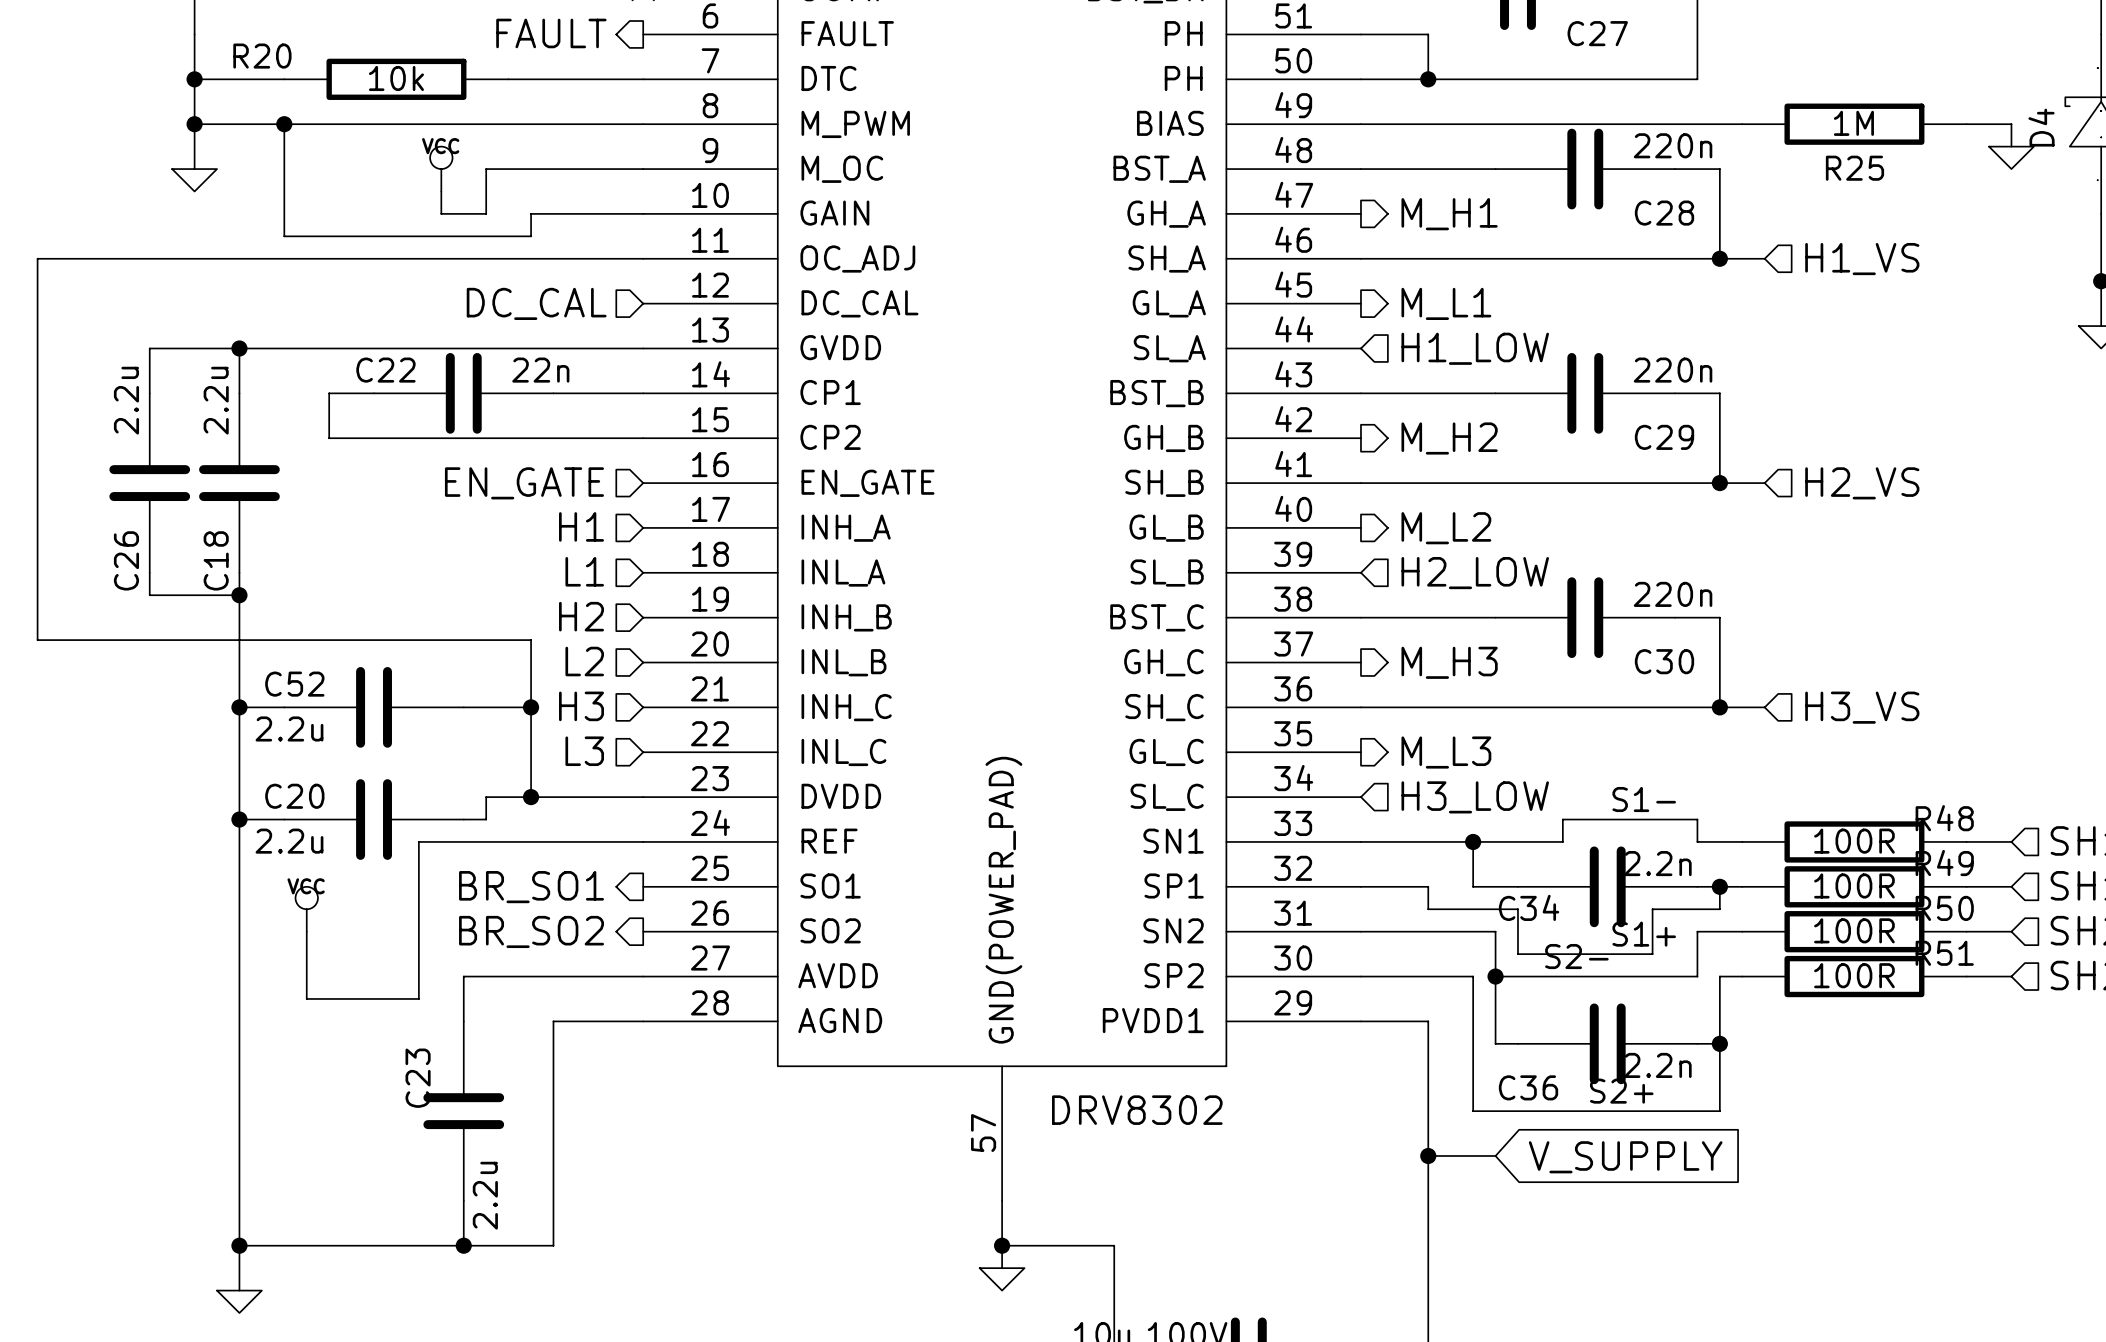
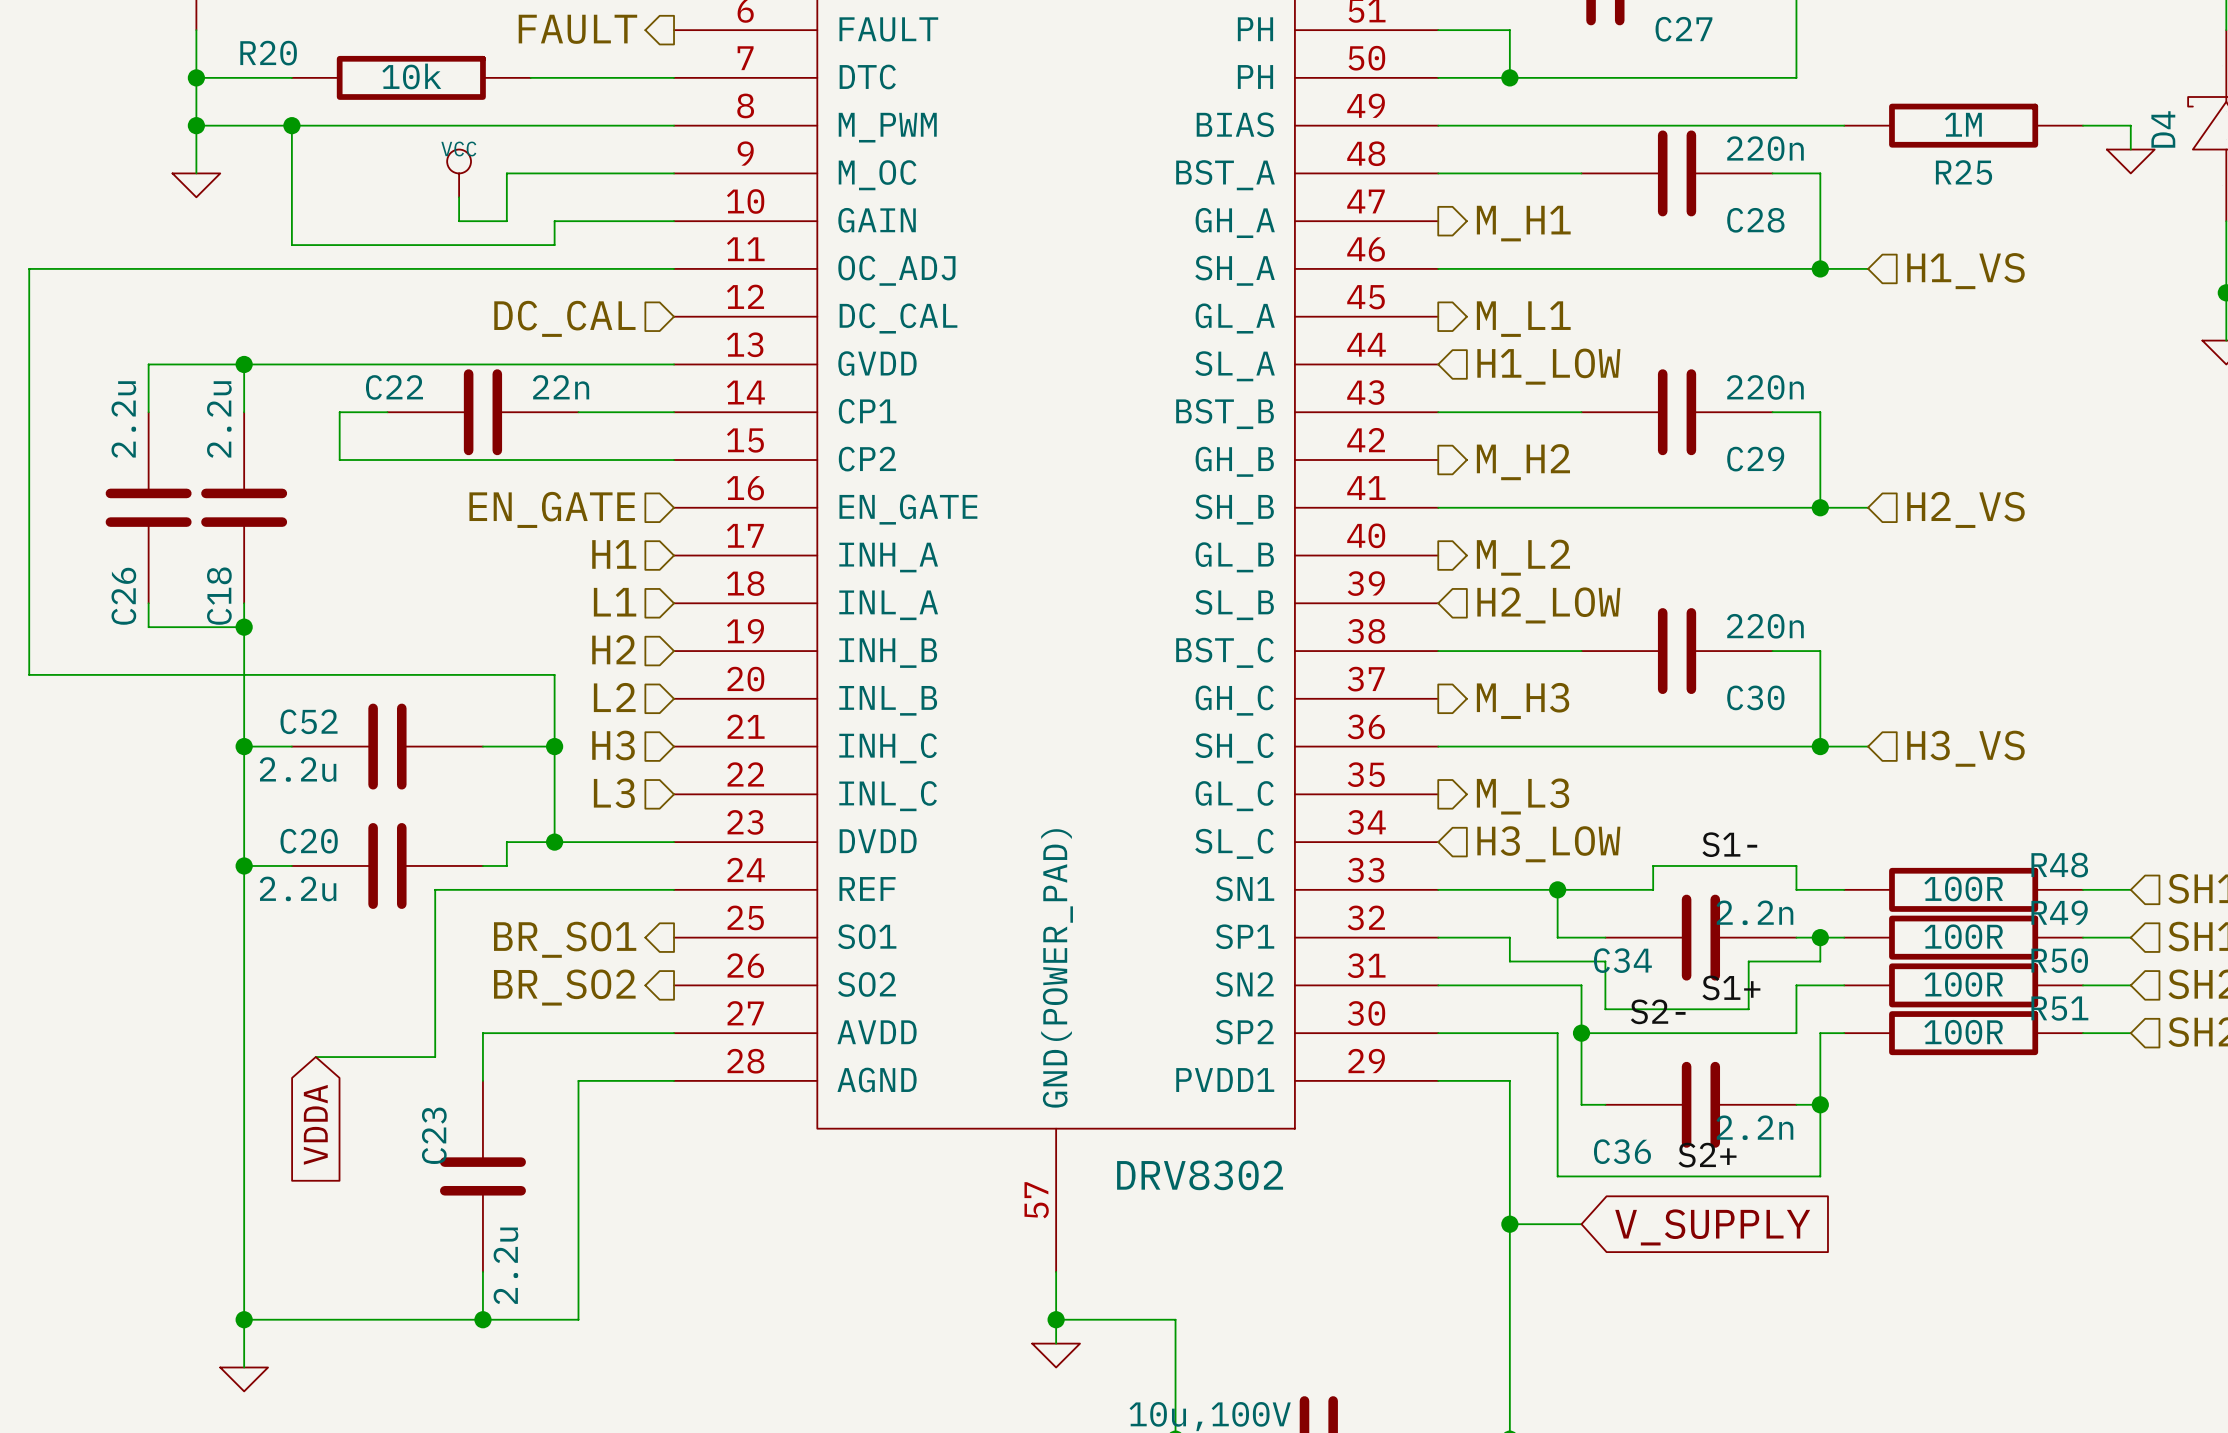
power symbol: VCC (306, 909) -> none
wire: (306, 931) (306, 998) -> none
global label: none -> VDDA (315, 1124)

